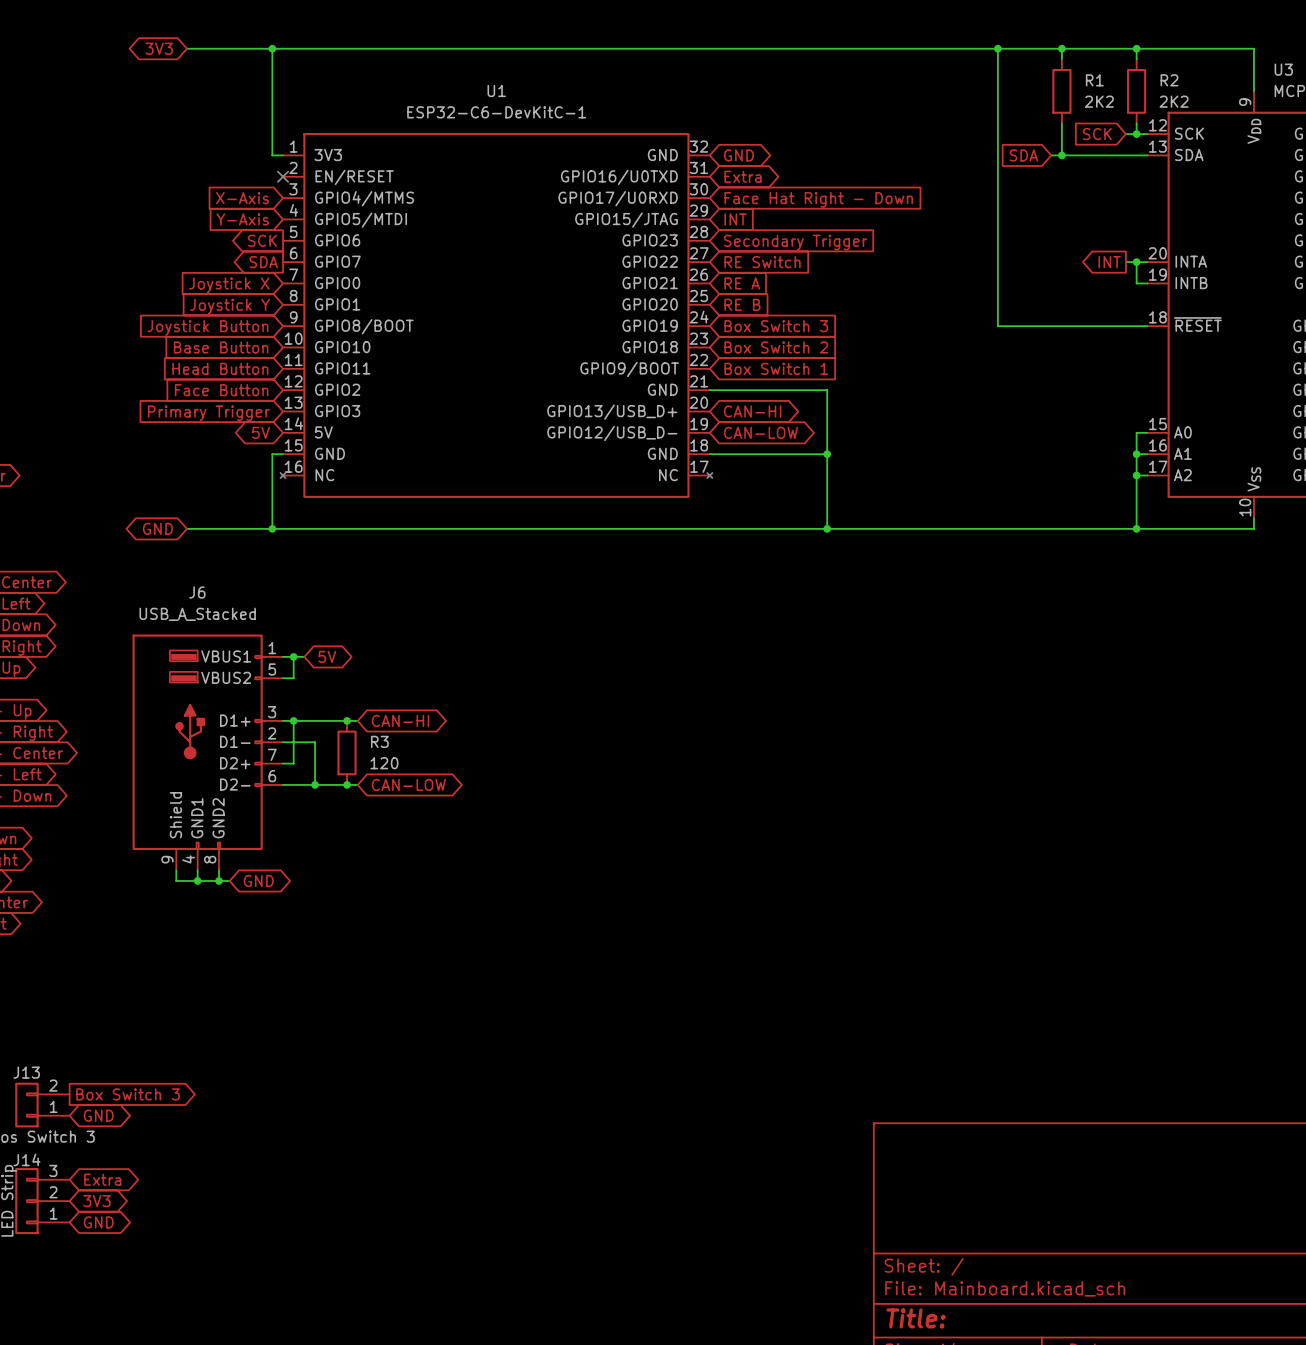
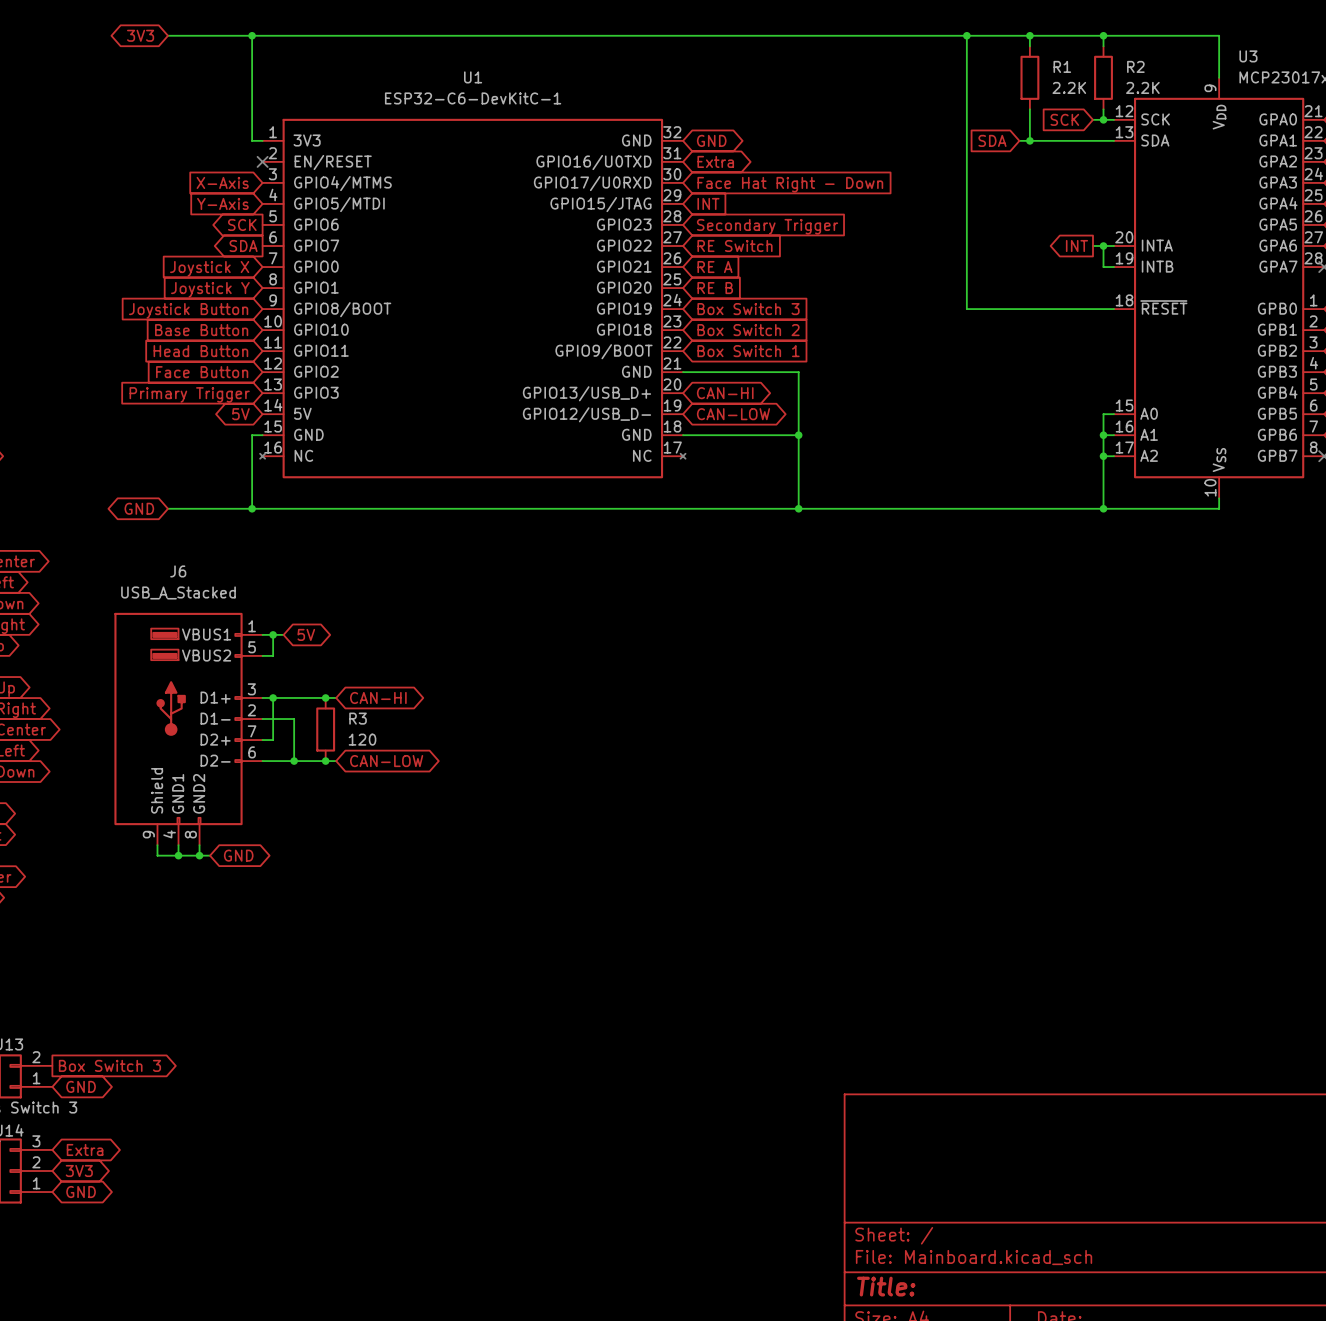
R1 value: 2K2 (1099, 101) -> 2.2K (1069, 87)
R2 value: 2K2 (1174, 101) -> 2.2K (1142, 87)

